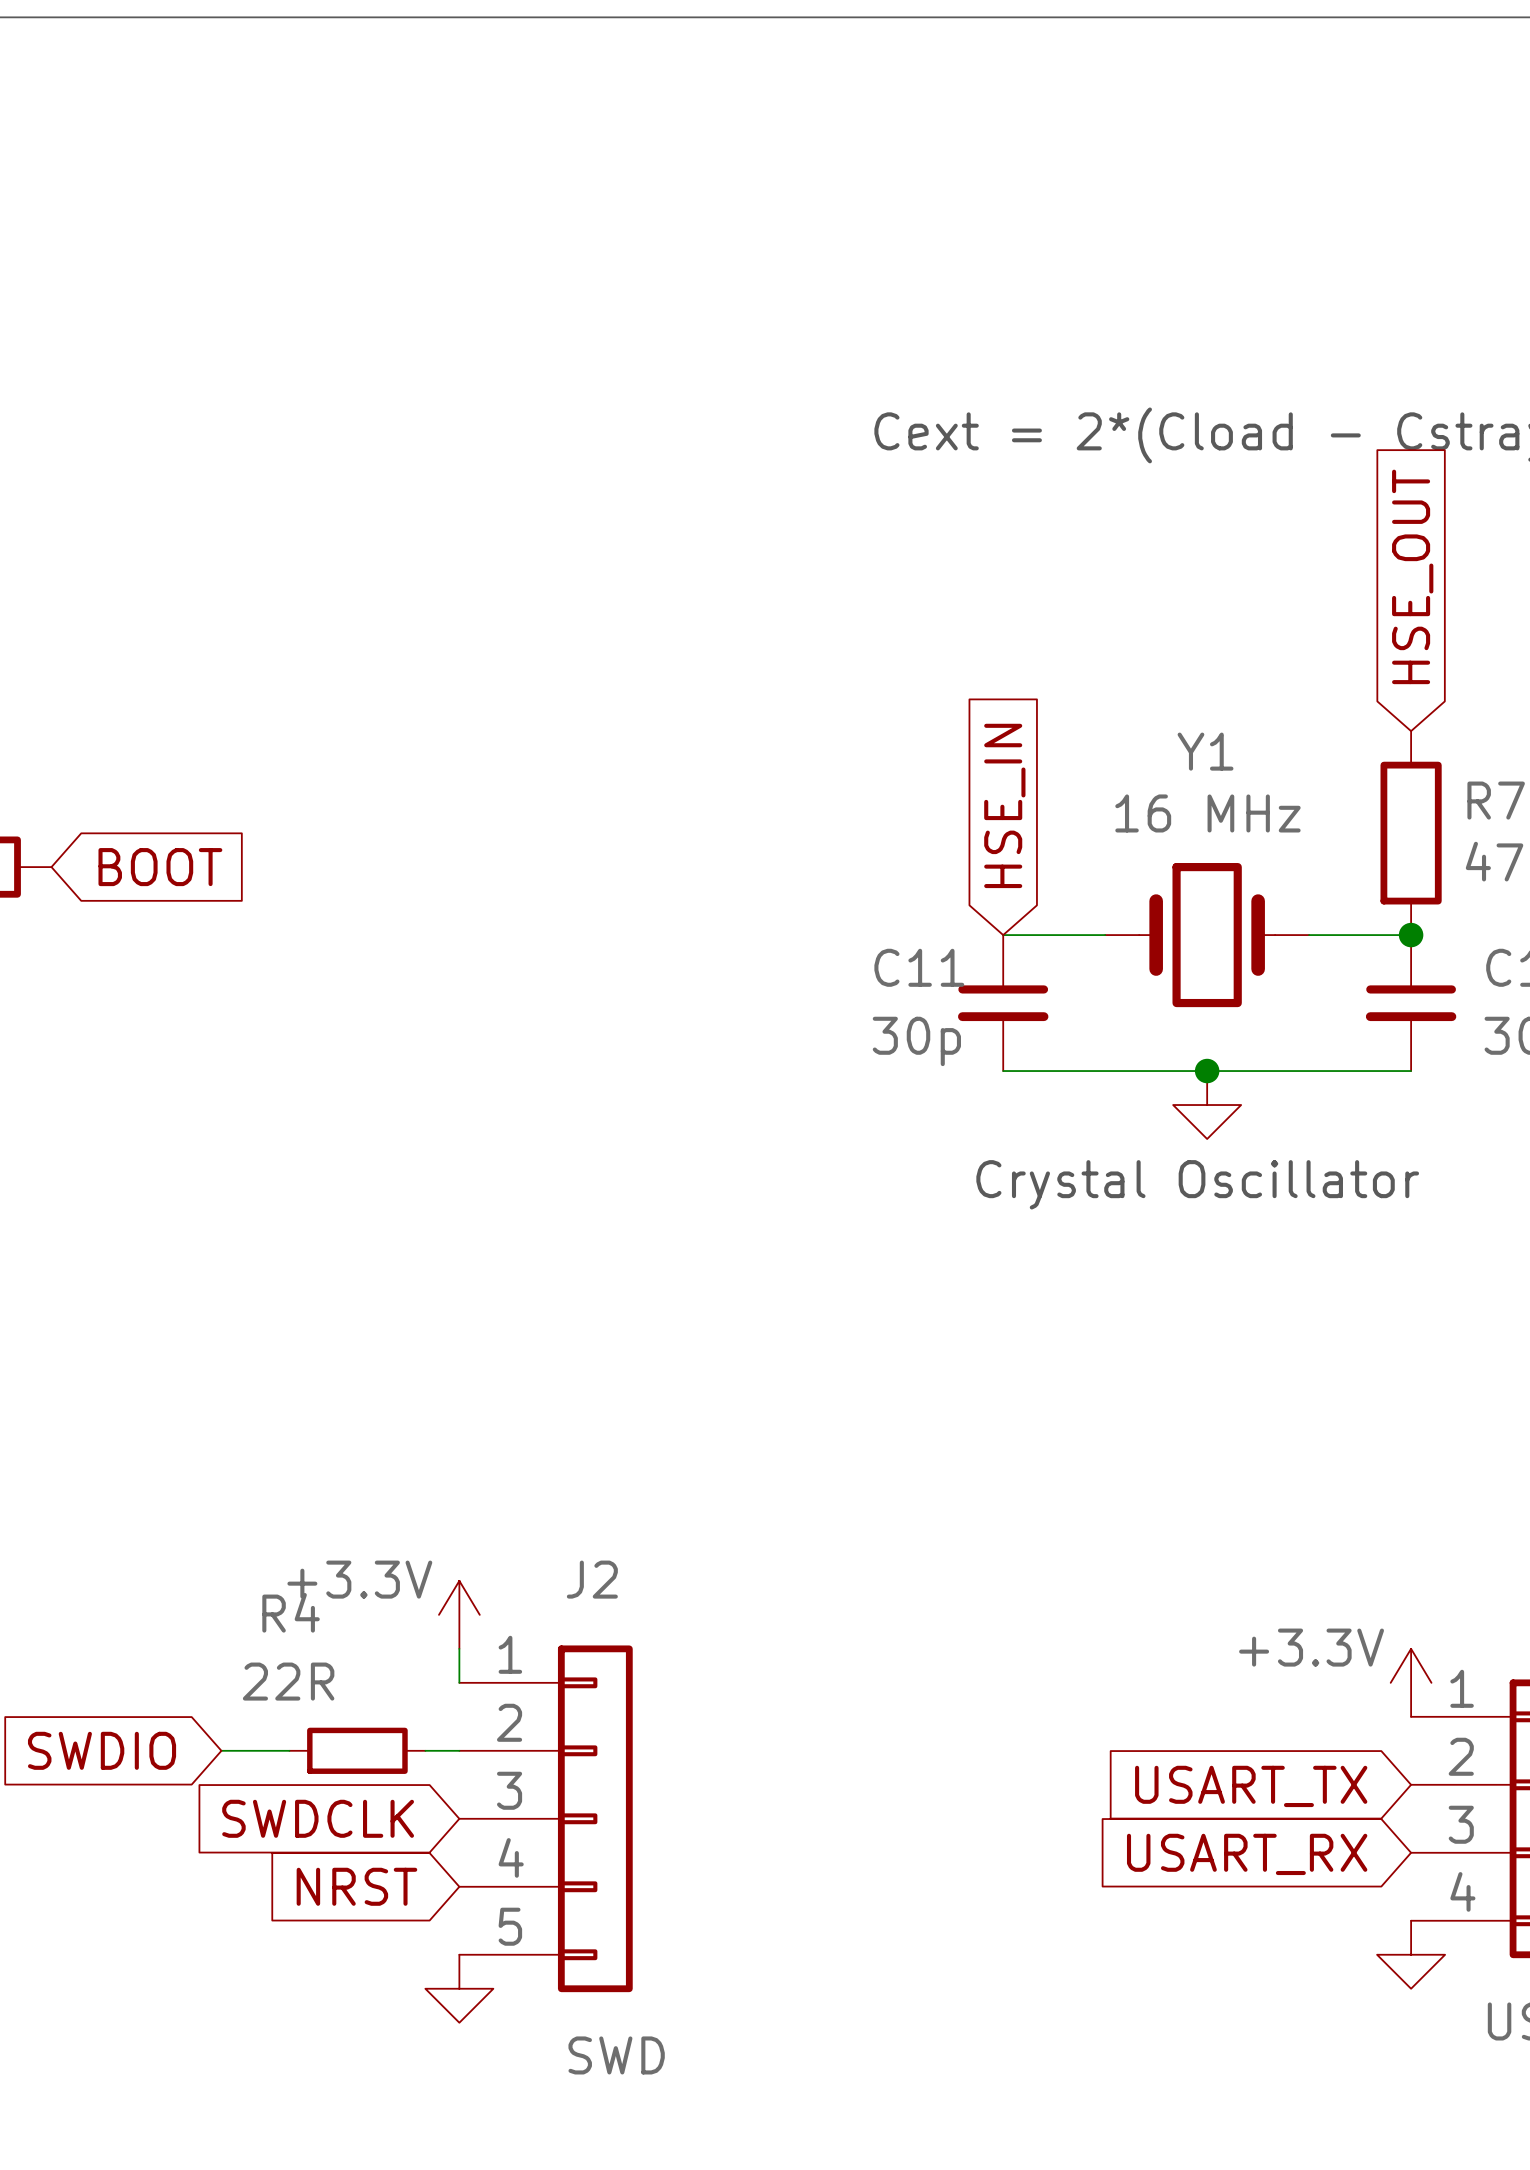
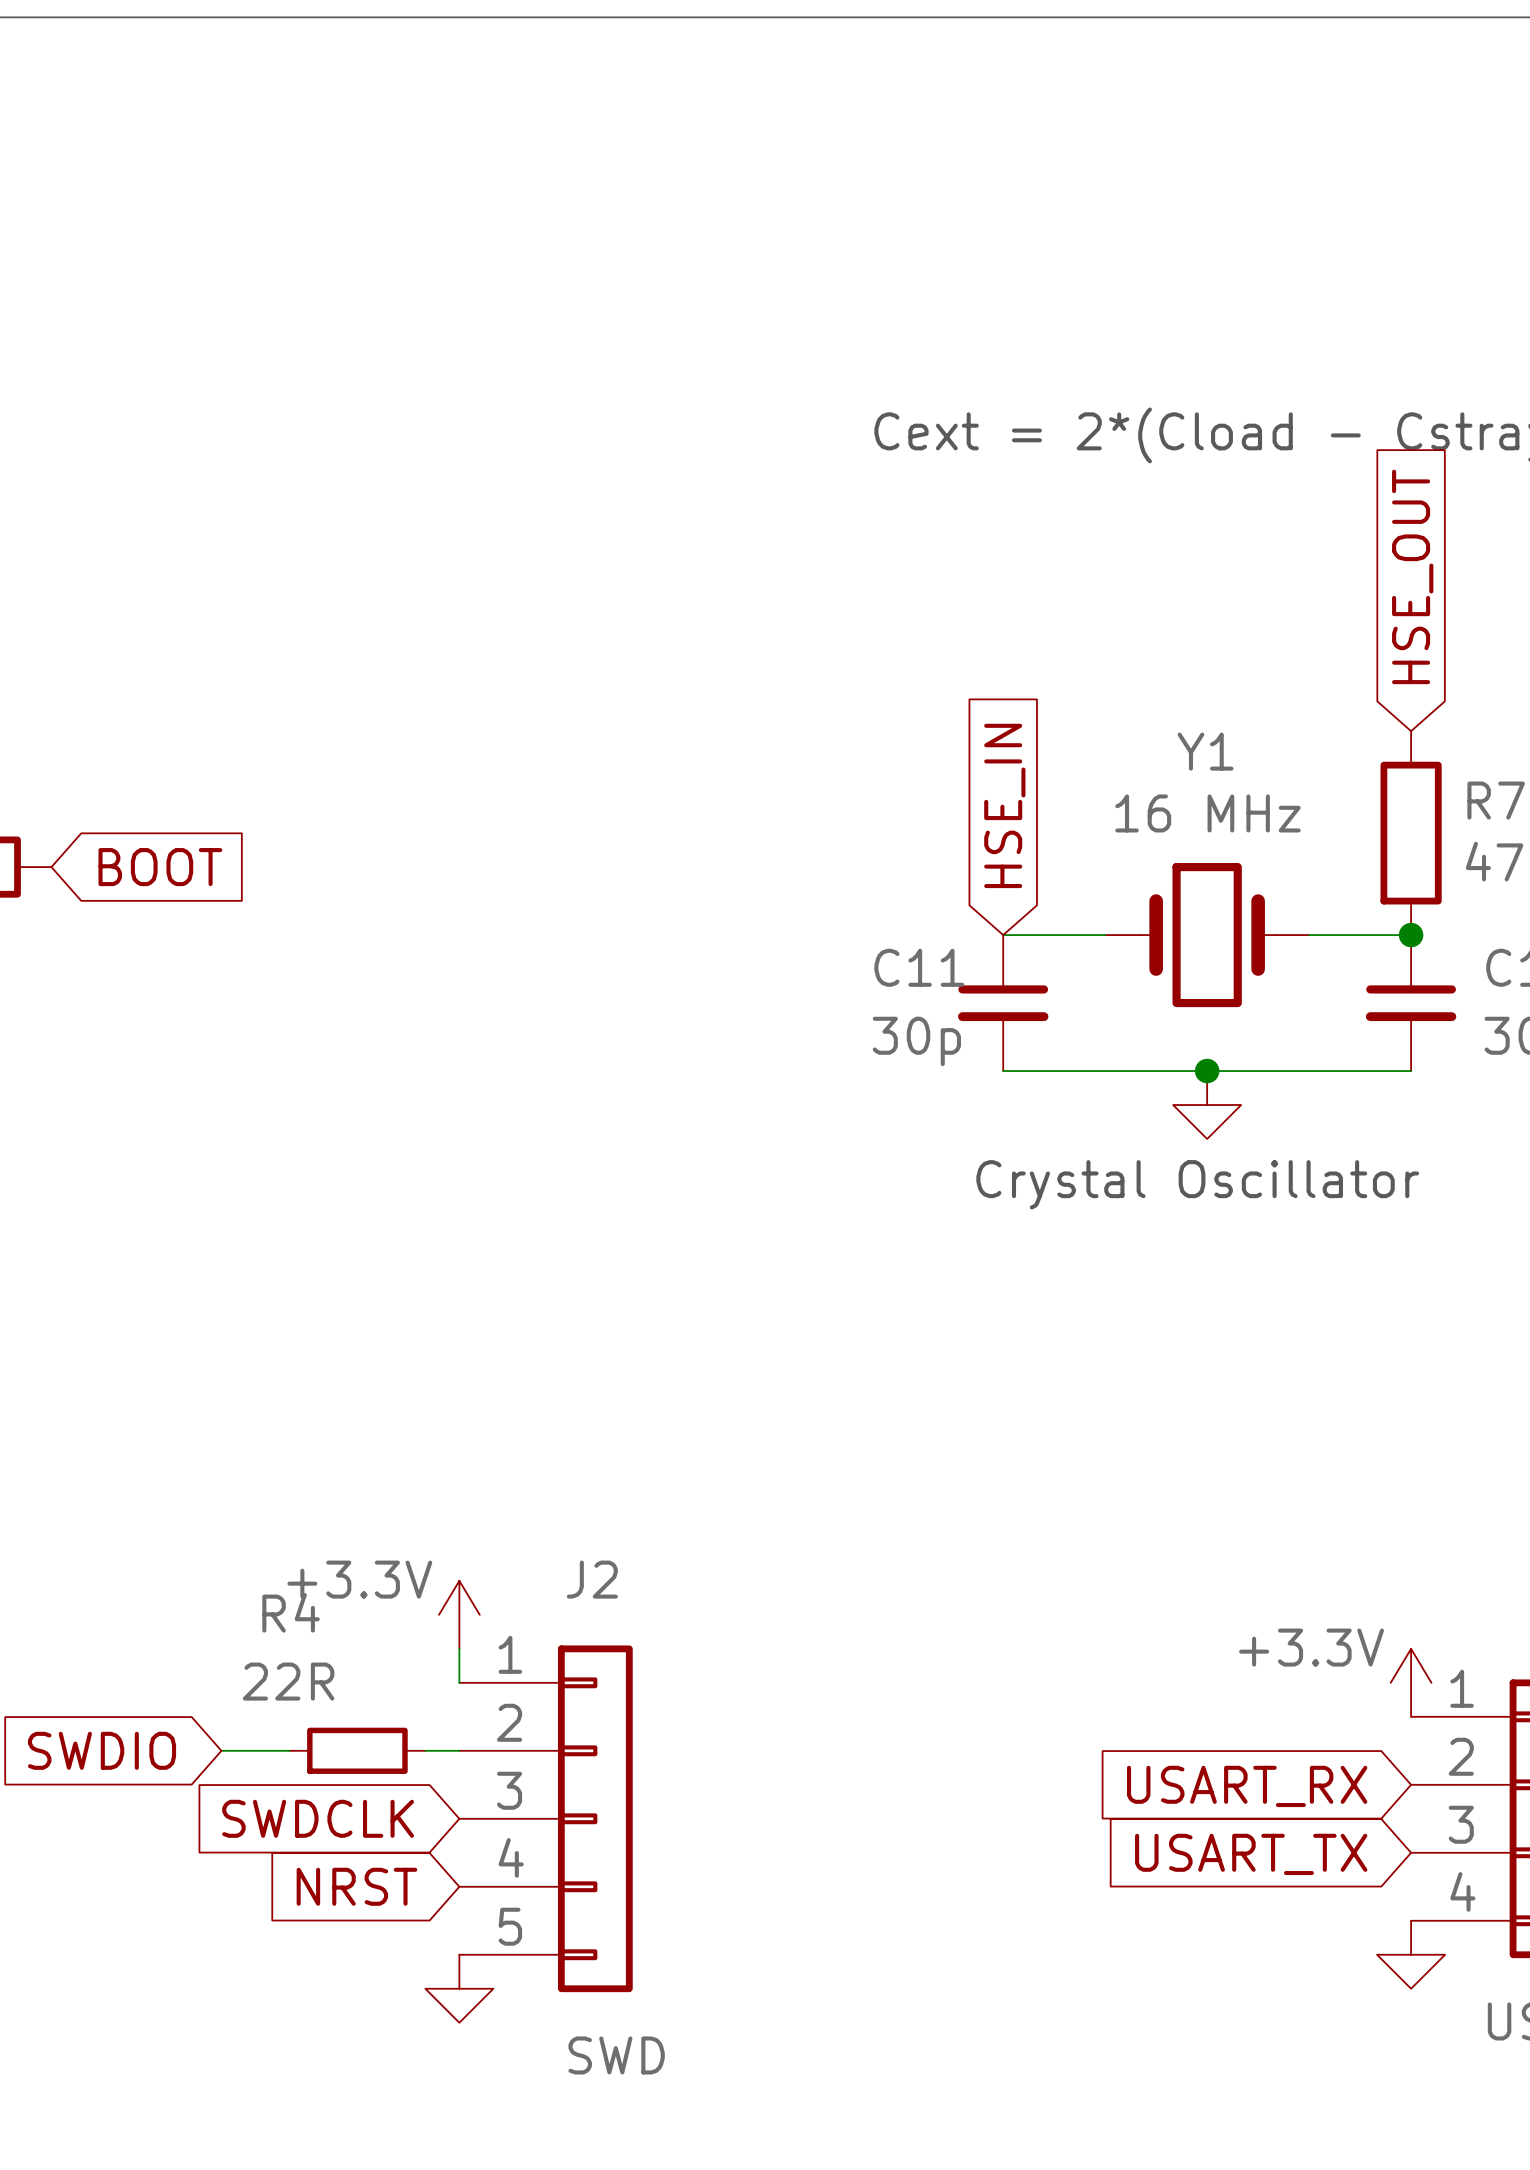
global label: USART_TX (1251, 1786) -> USART_RX (1247, 1786)
global label: USART_RX (1247, 1854) -> USART_TX (1251, 1854)

